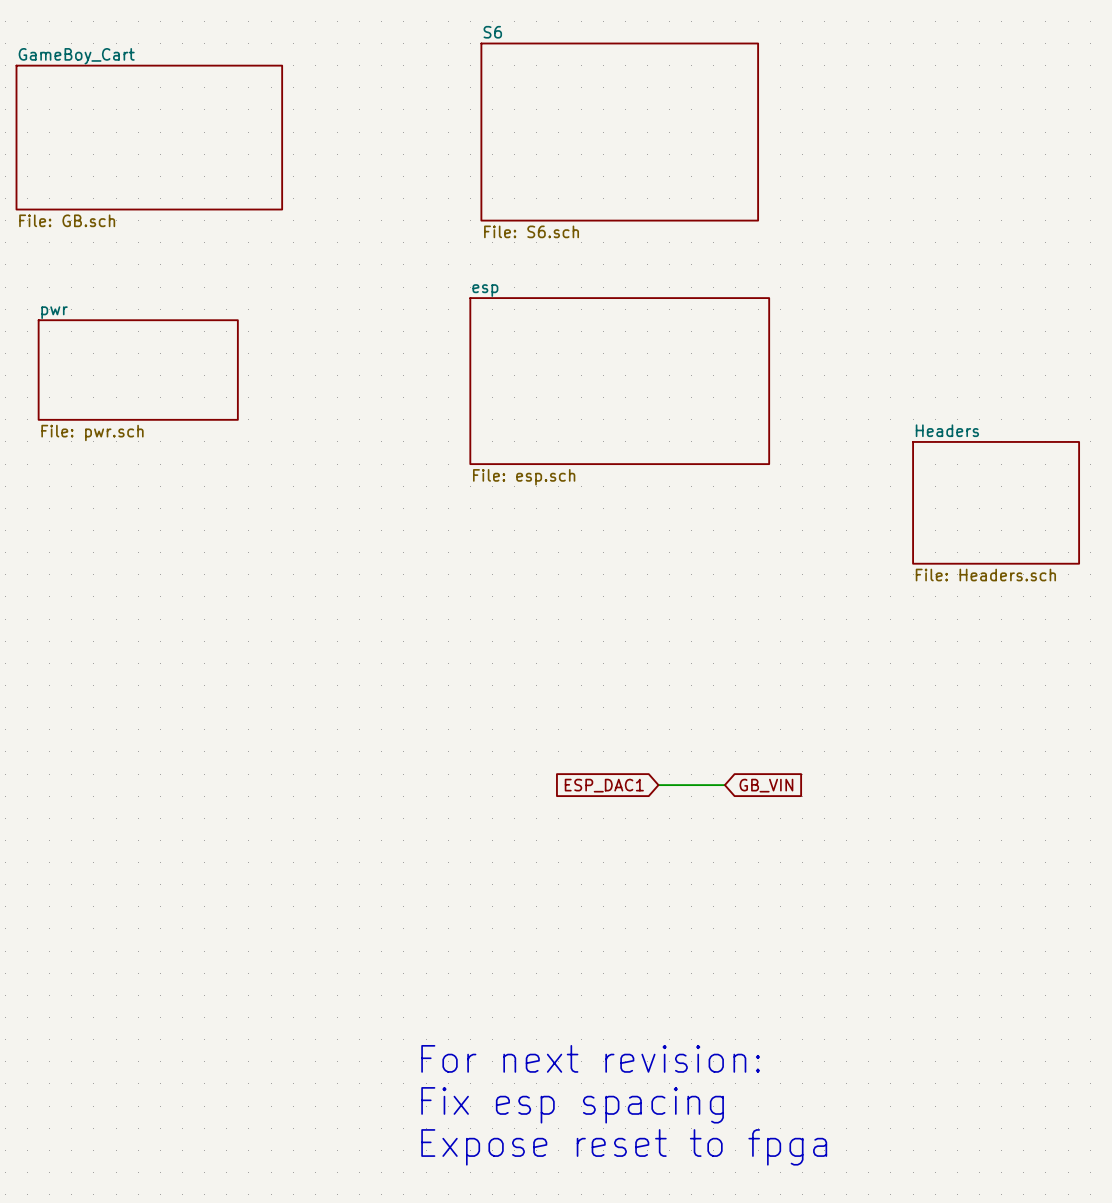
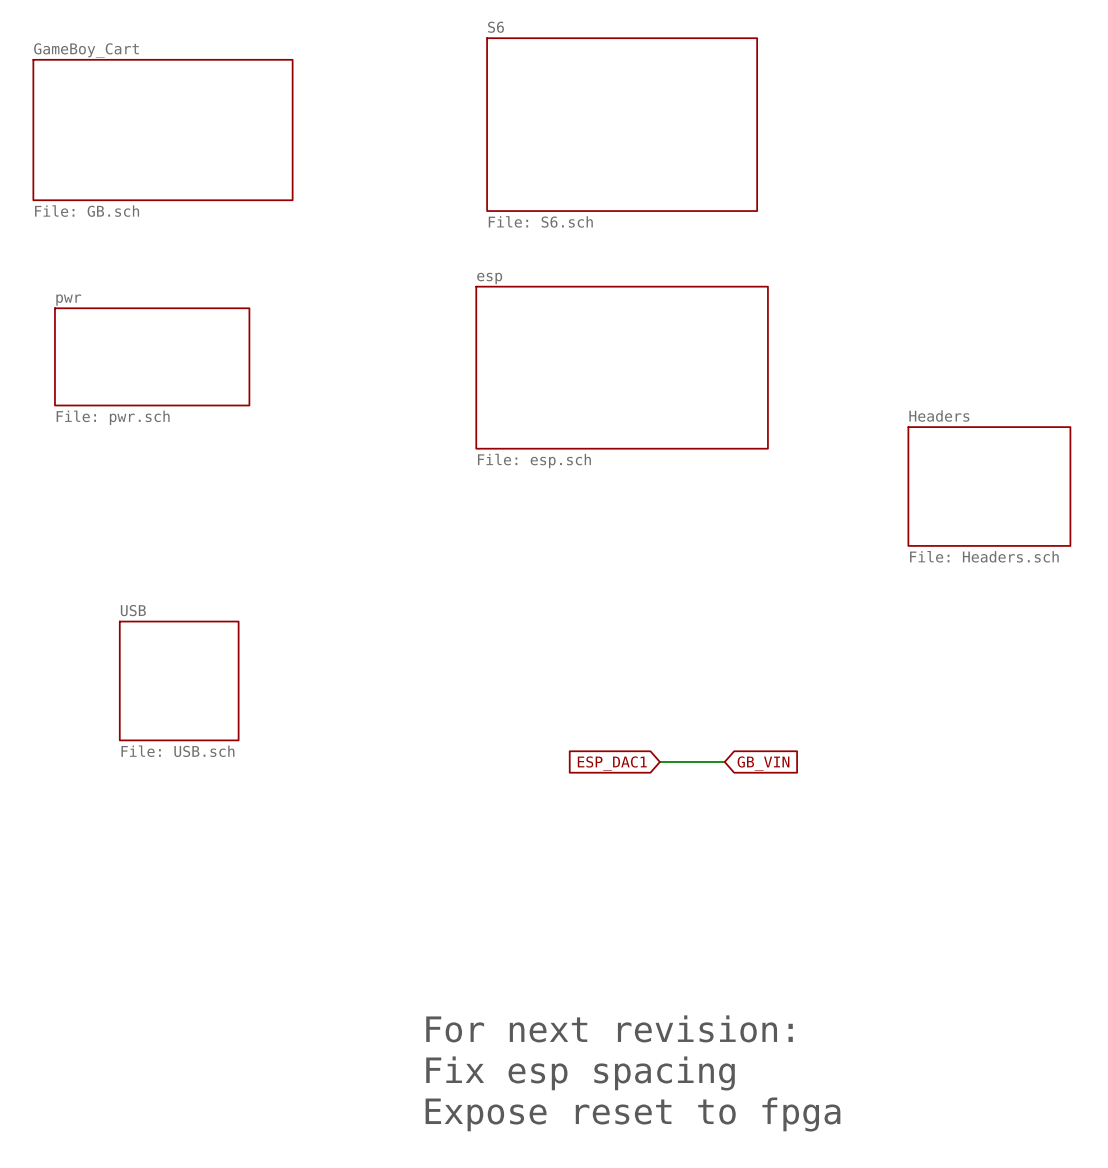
sheet USB: none -> File: USB.sch (179, 680)

